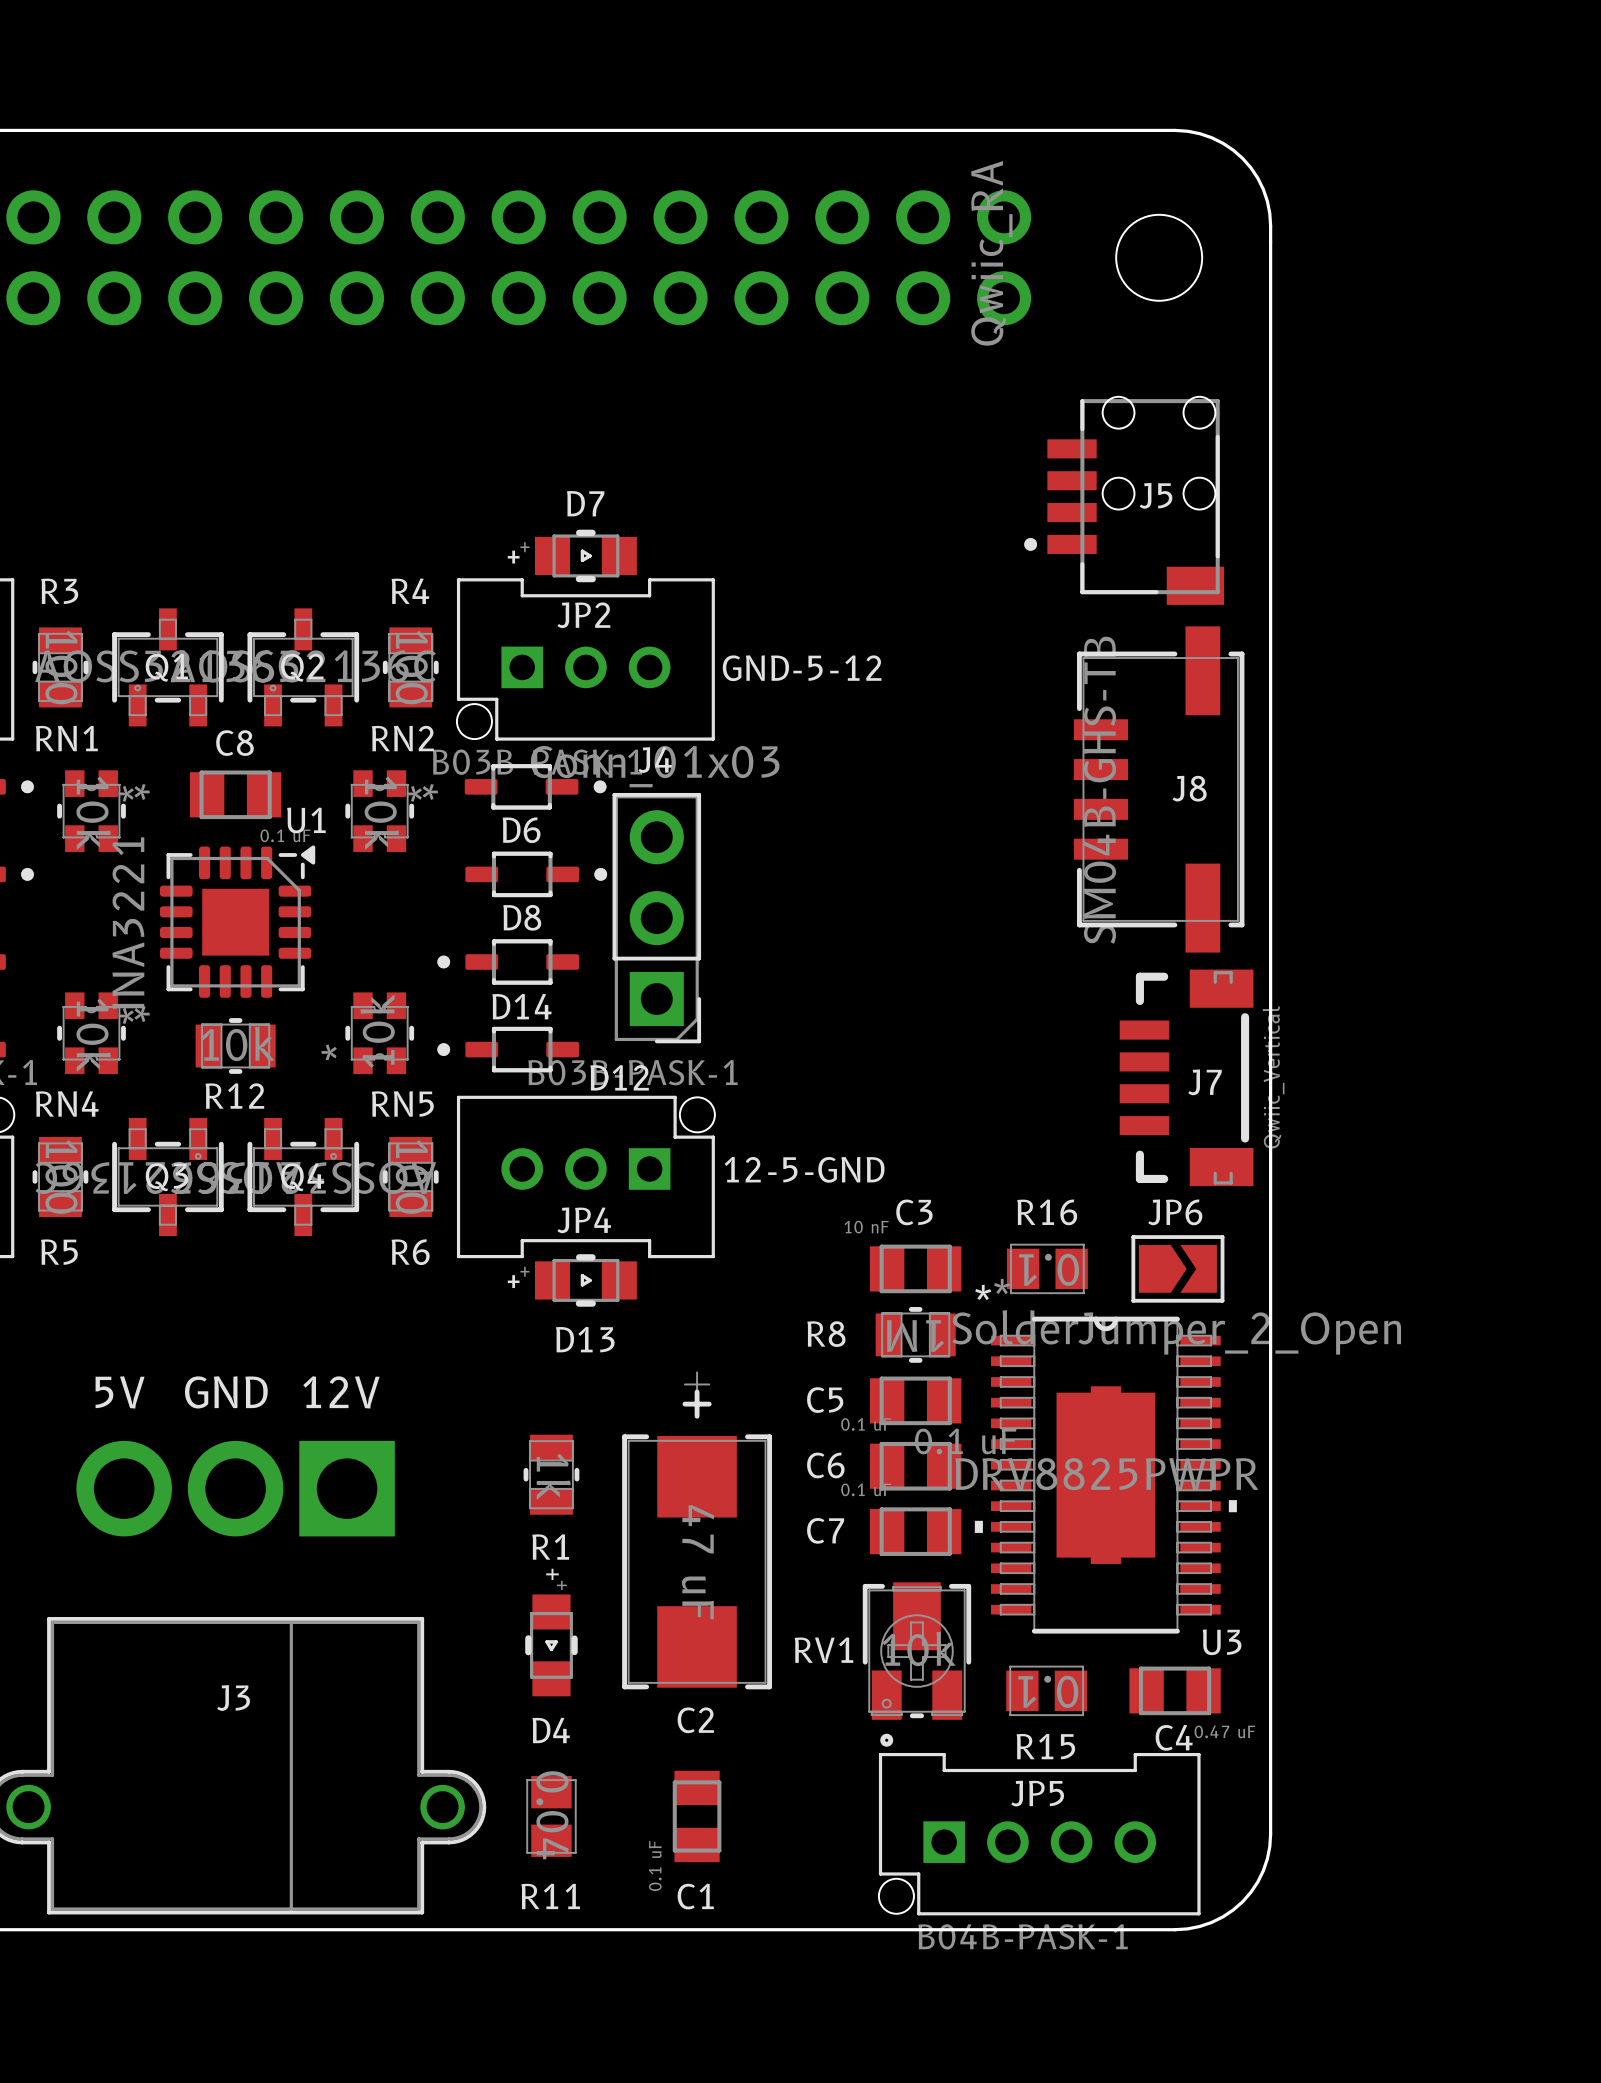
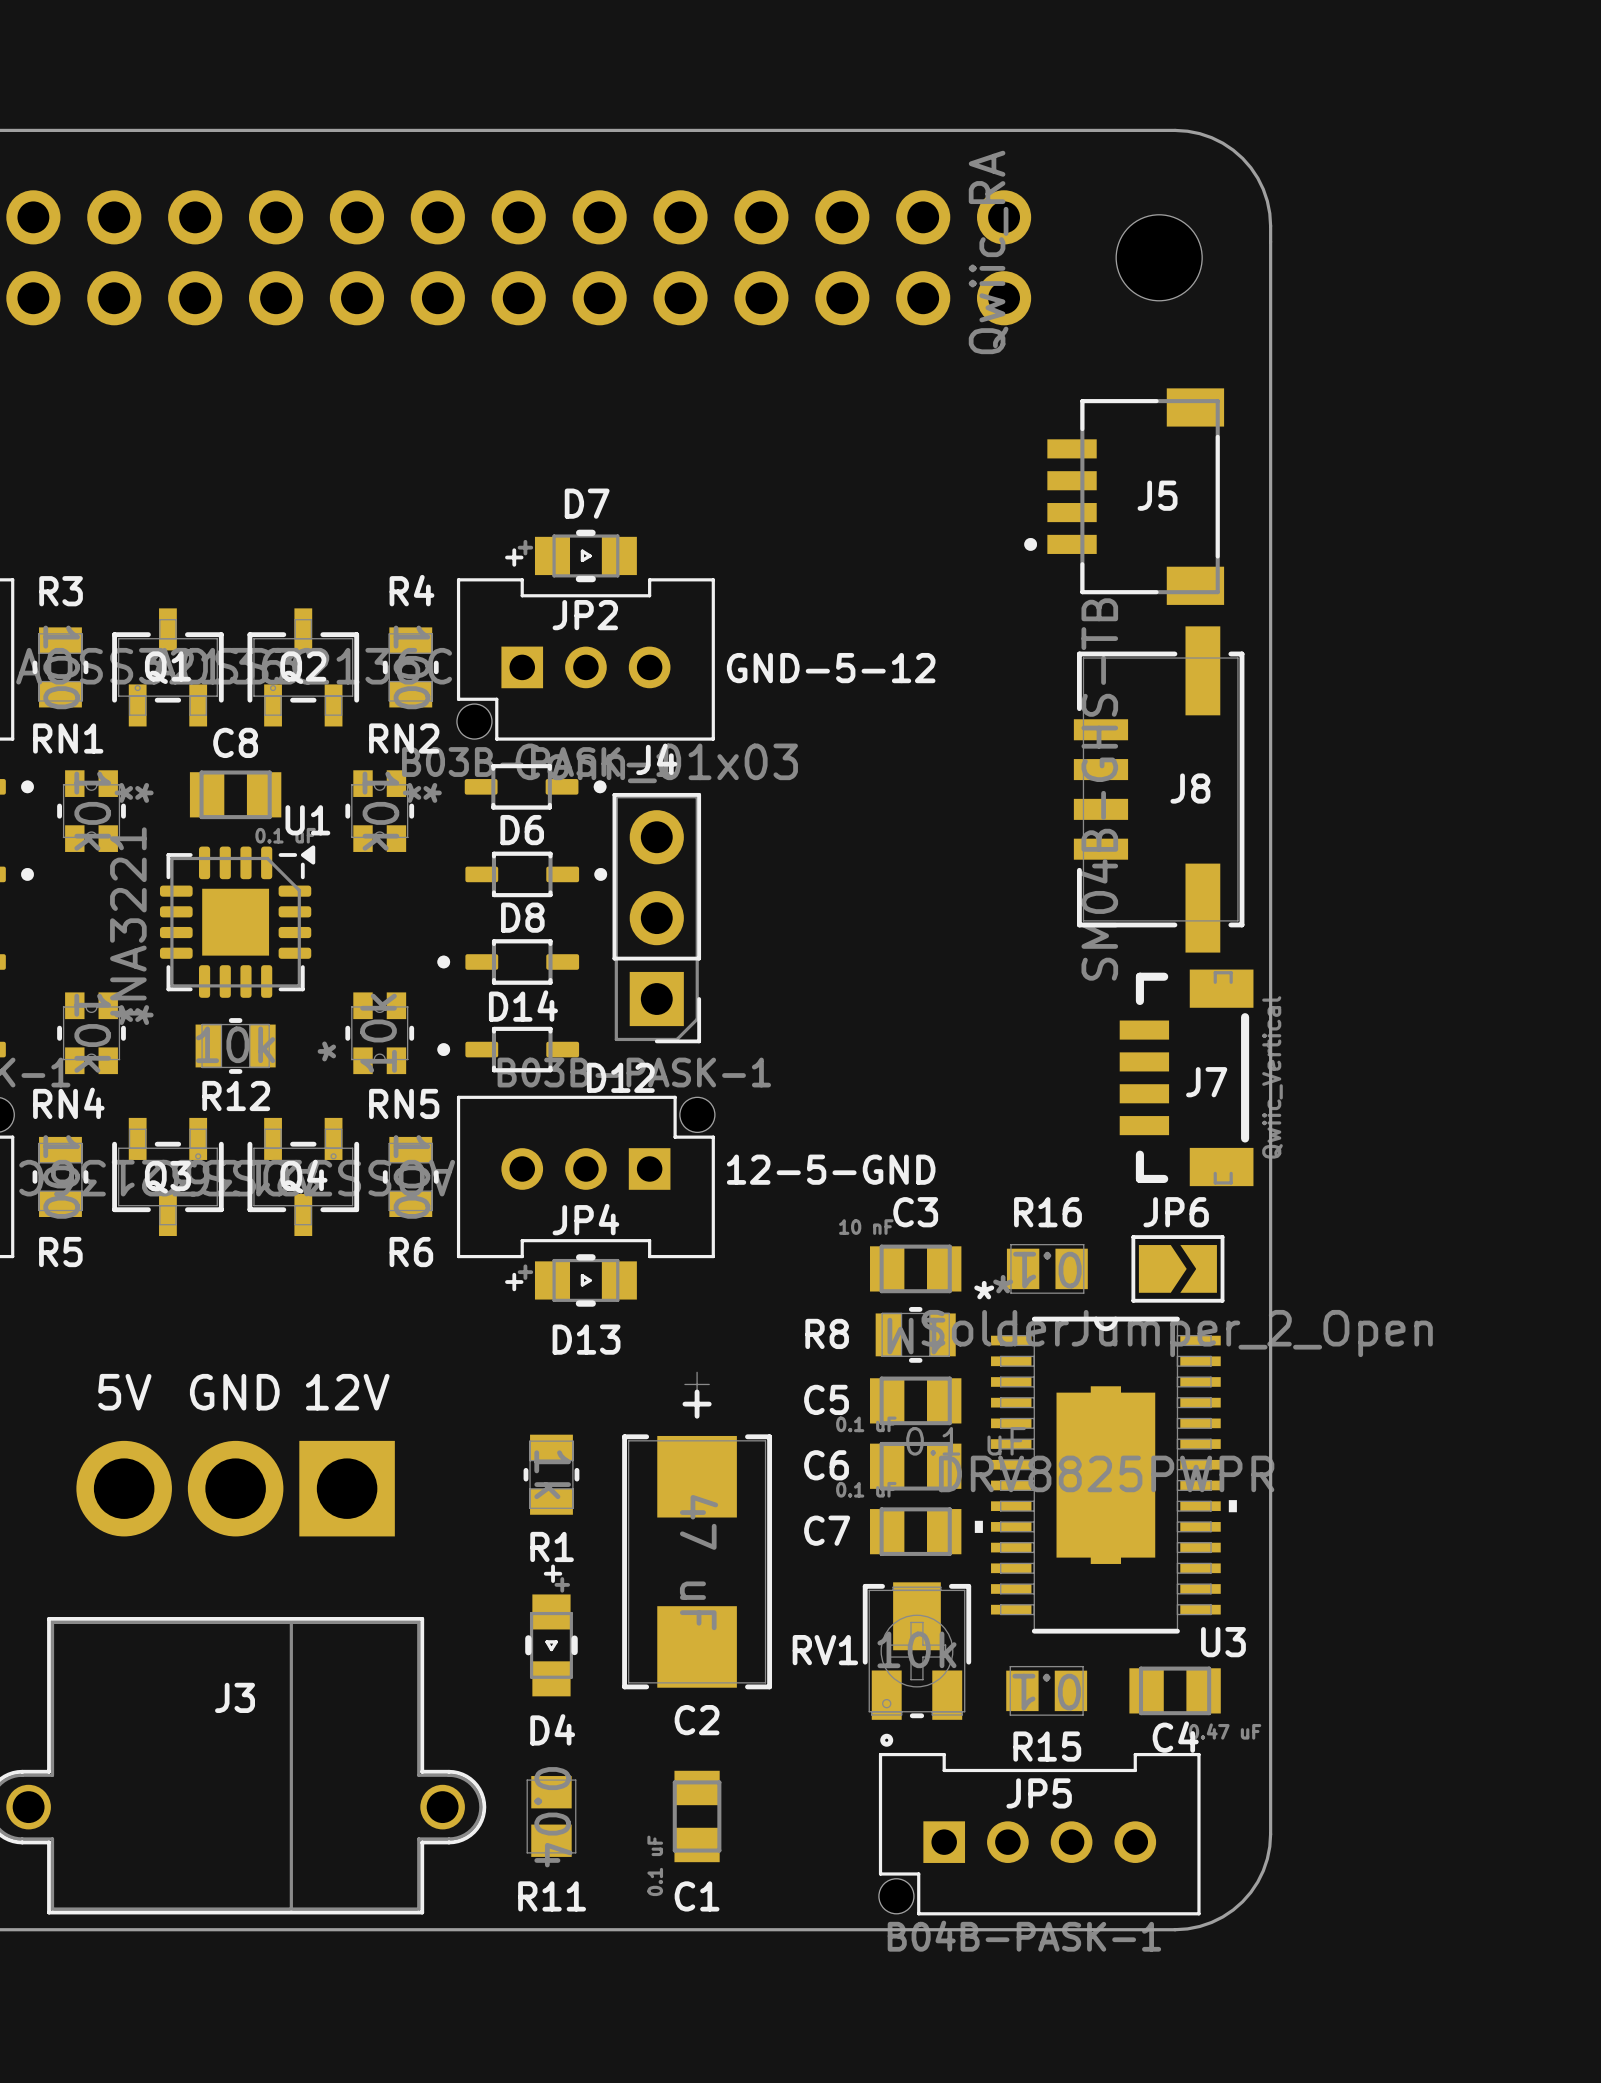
round board edge: [1101, 396, 1136, 430] -> none
round board edge: [1182, 396, 1217, 430] -> none
J5 footprint: [1024, 399, 1225, 605] -> [1024, 388, 1225, 605]
round board edge: [1101, 476, 1136, 511] -> none
round board edge: [1182, 476, 1217, 511] -> none

